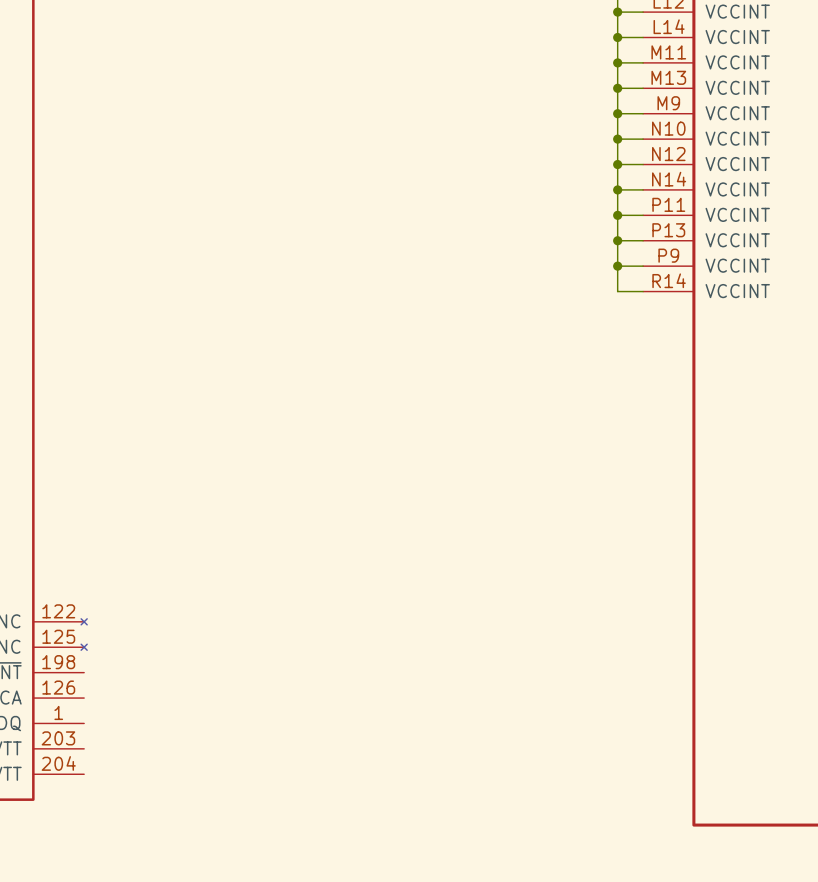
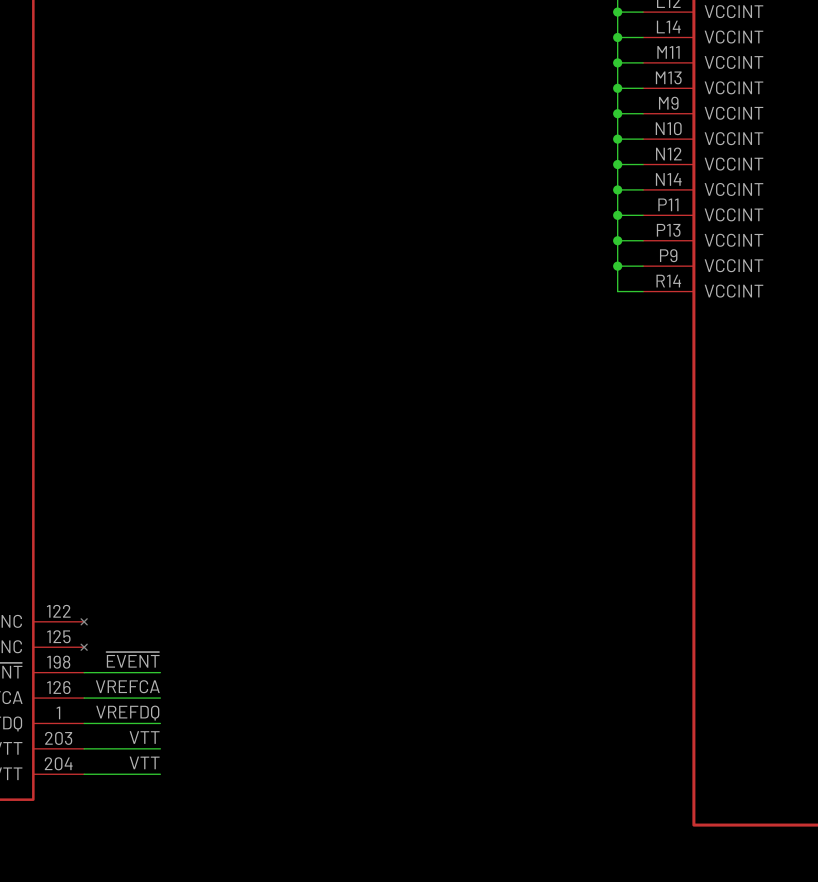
label: none -> ~{EVENT} (132, 659)
wire: none -> (84, 672) (160, 672)
label: none -> VREFCA (127, 686)
wire: none -> (84, 698) (160, 698)
label: none -> VREFDQ (127, 713)
wire: none -> (84, 723) (160, 723)
label: none -> VTT (144, 737)
wire: none -> (84, 748) (160, 748)
label: none -> VTT (144, 762)
wire: none -> (84, 774) (160, 774)

